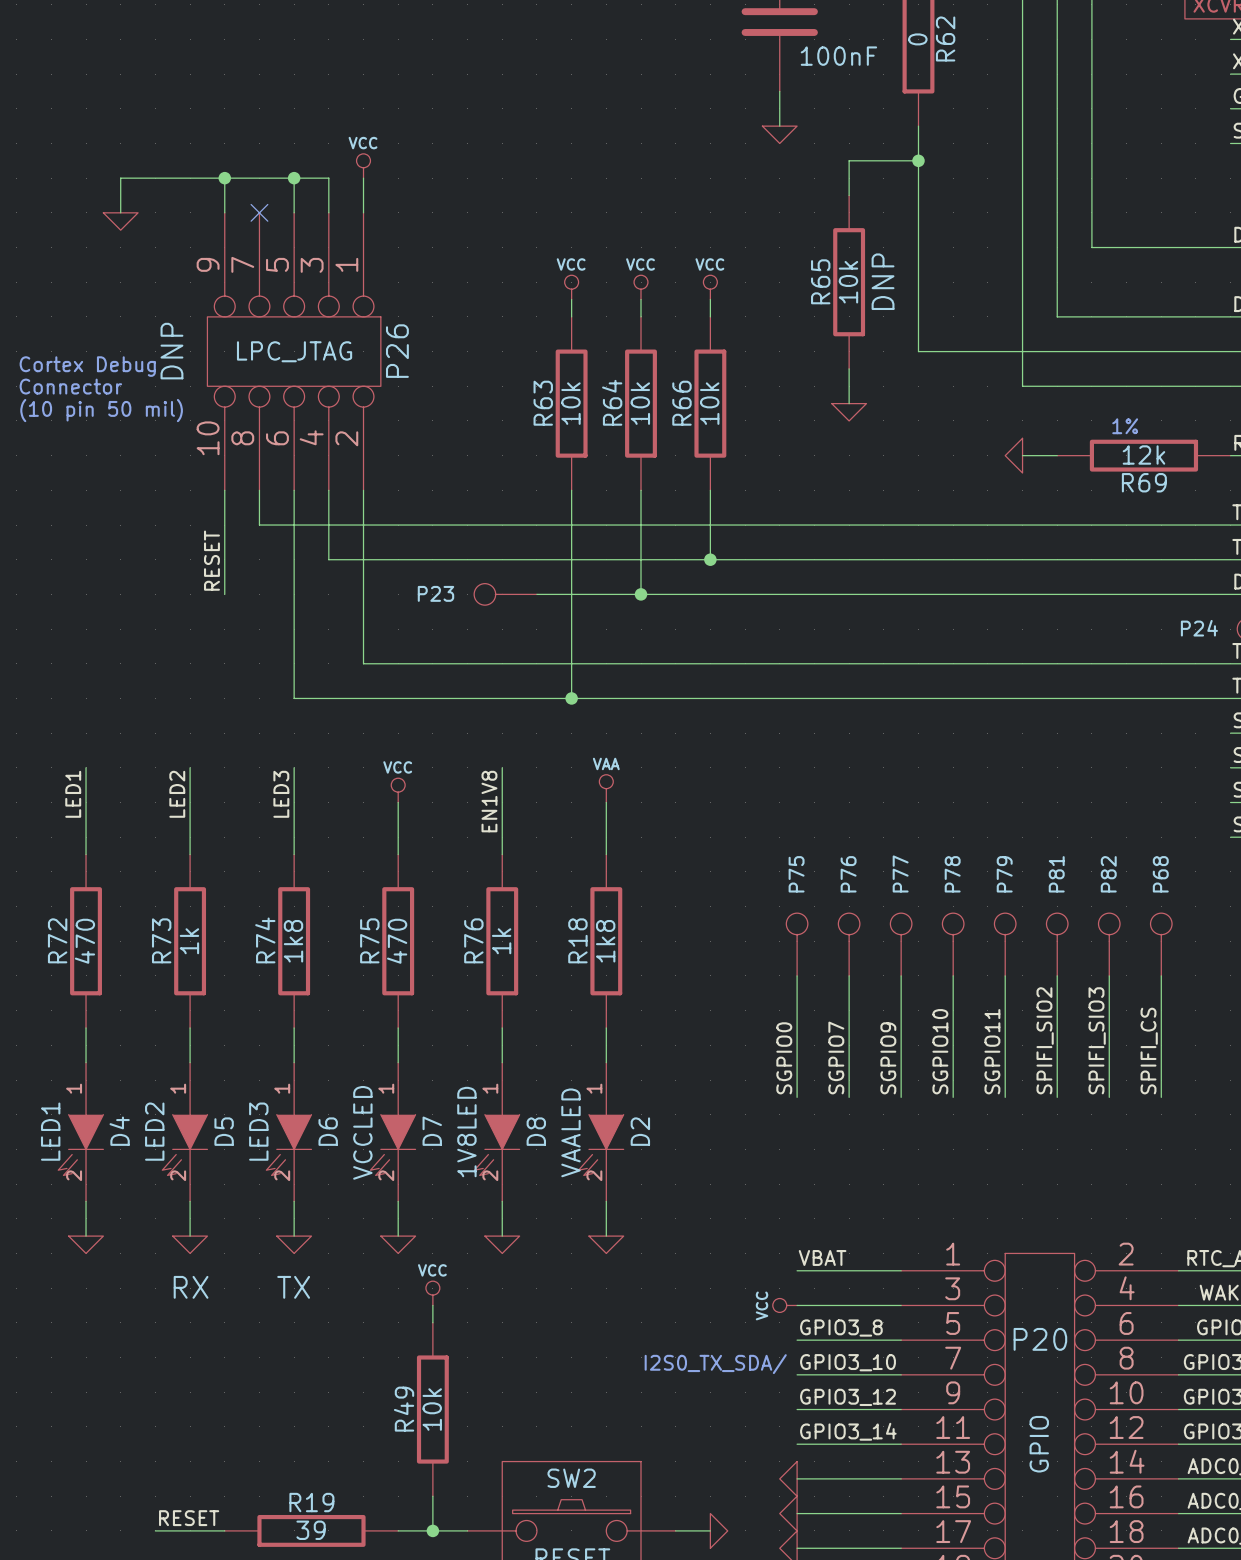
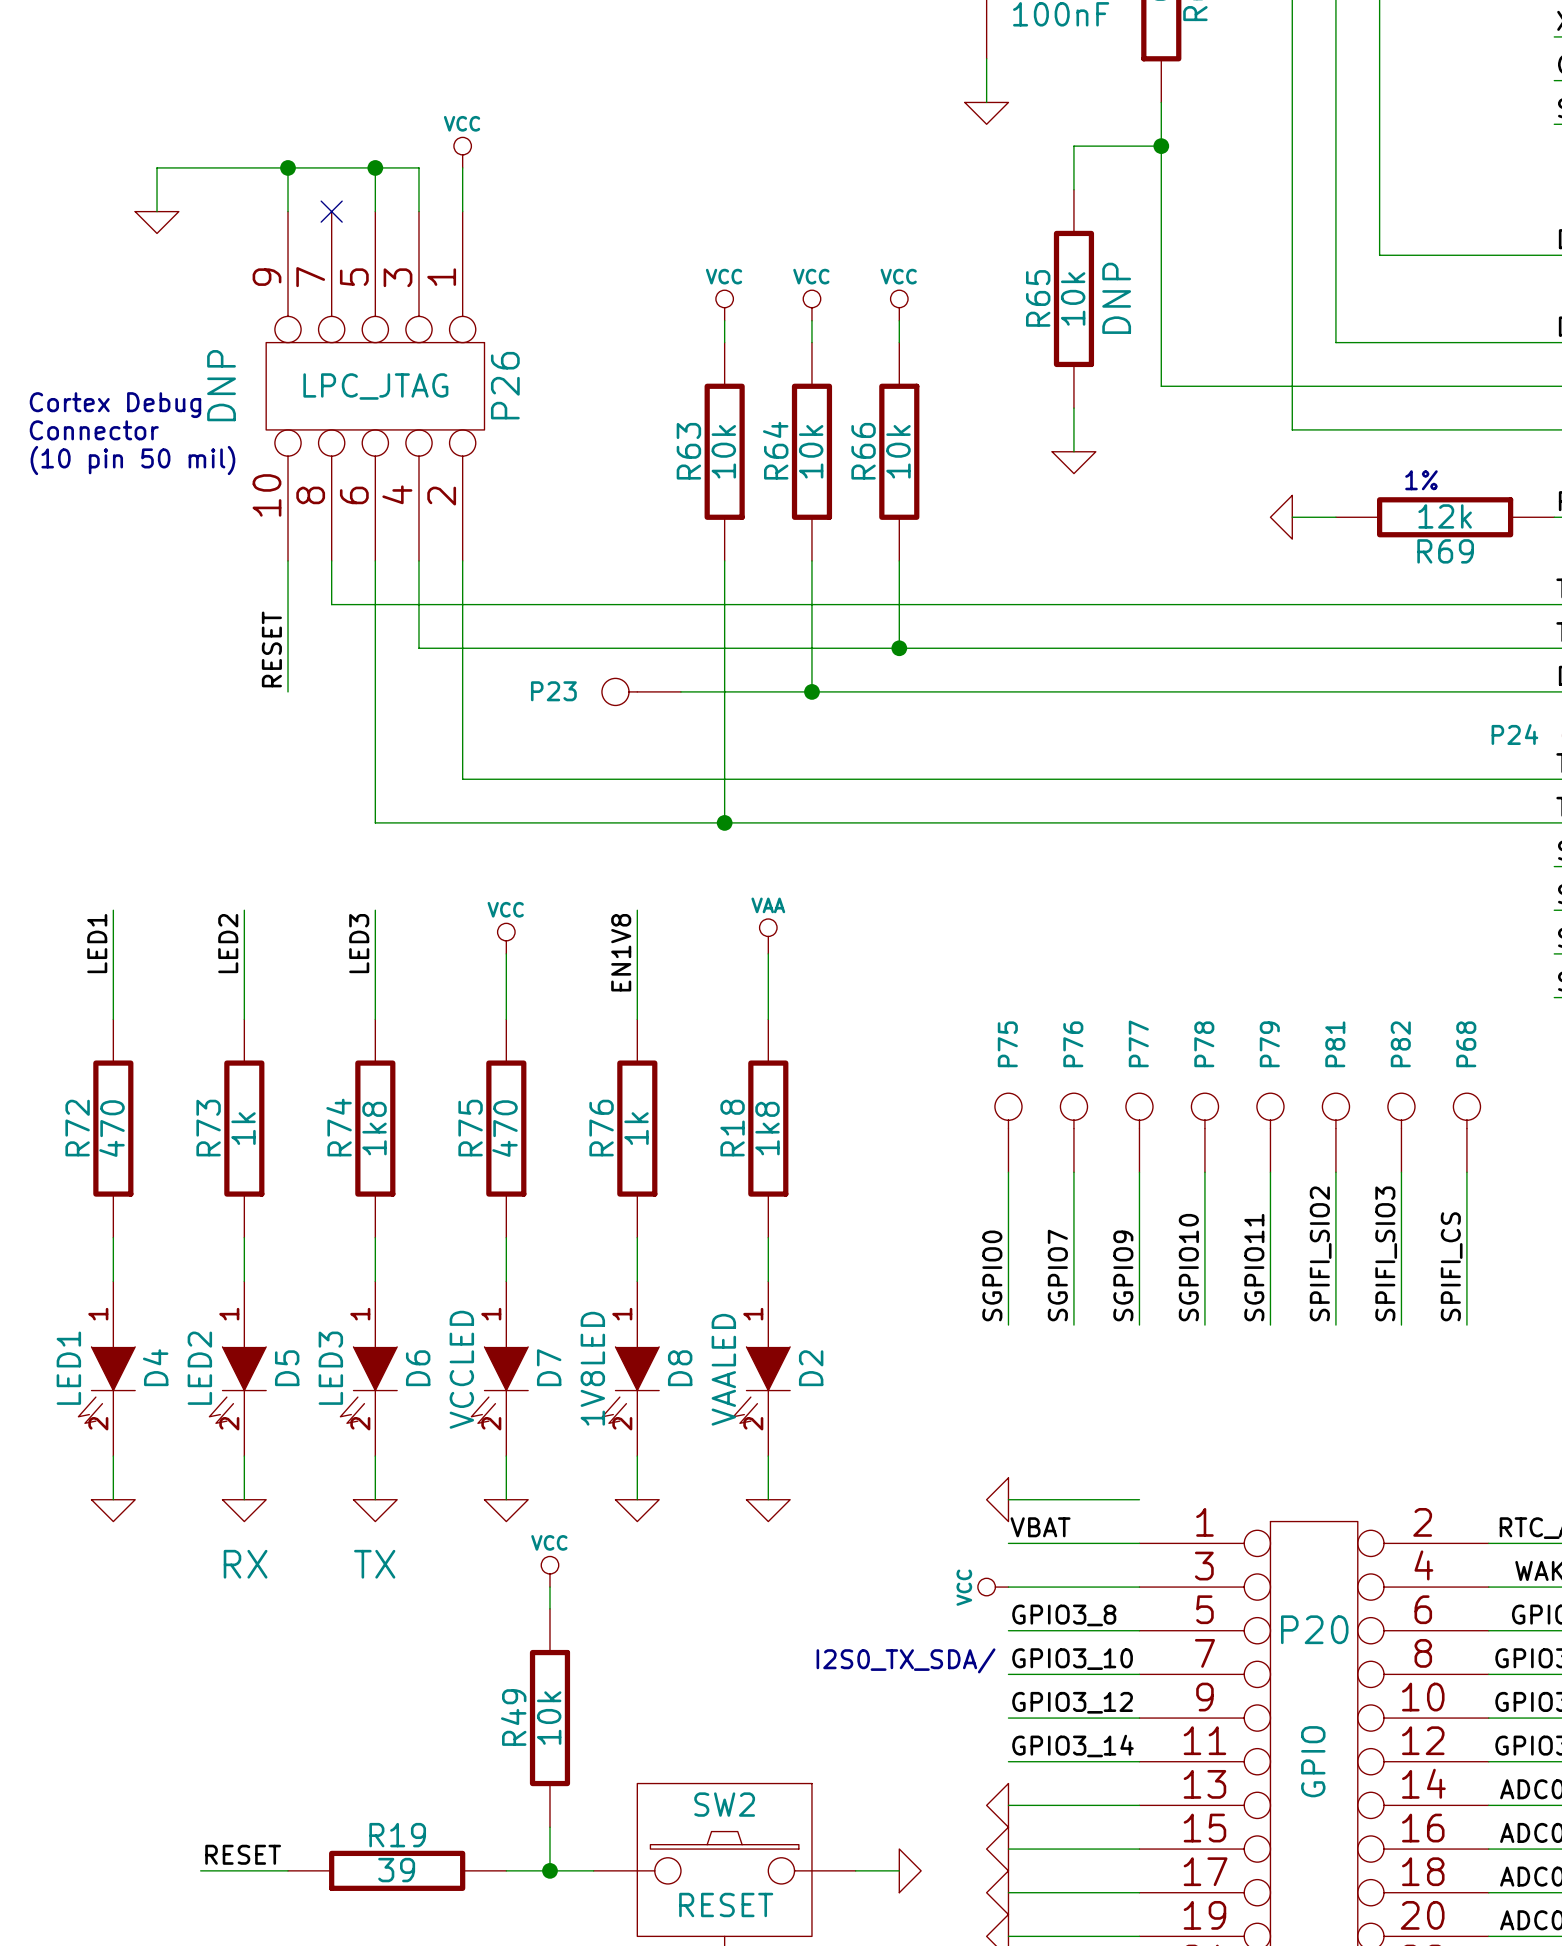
power symbol: none -> (997, 1499)
wire: none -> (1008, 1499) (1139, 1499)

